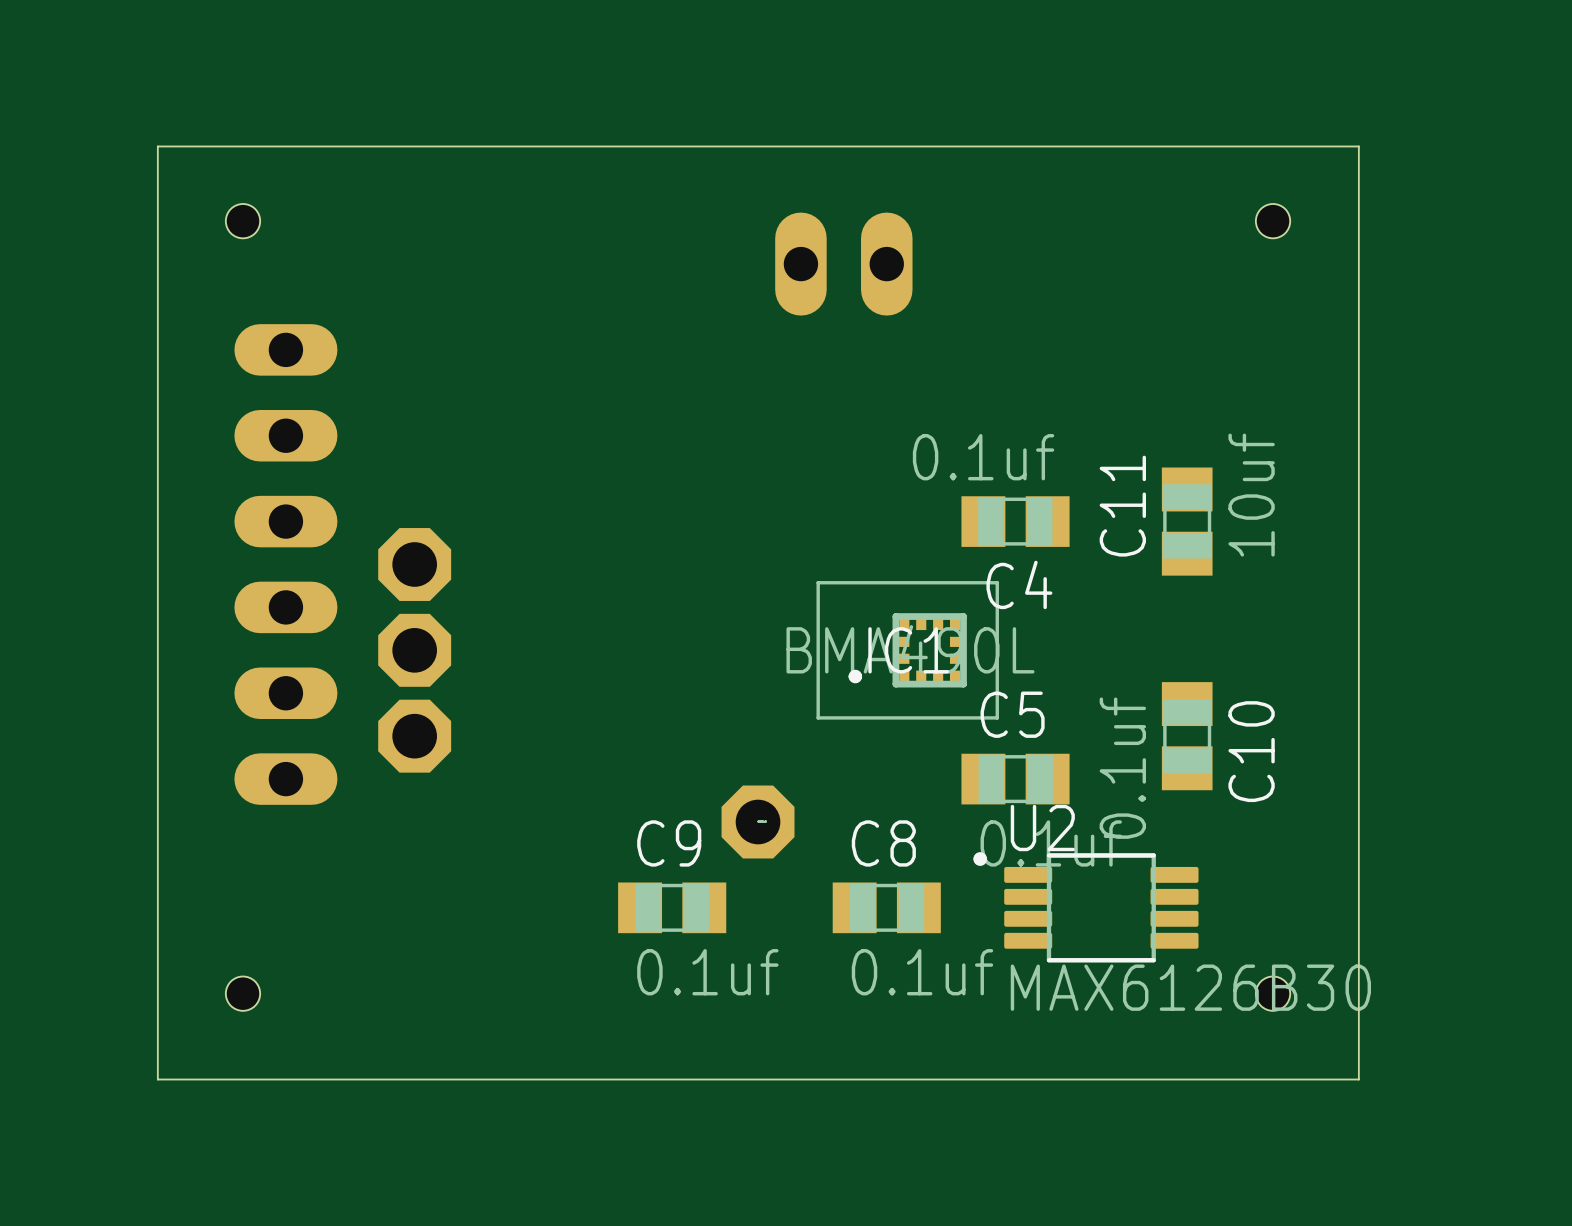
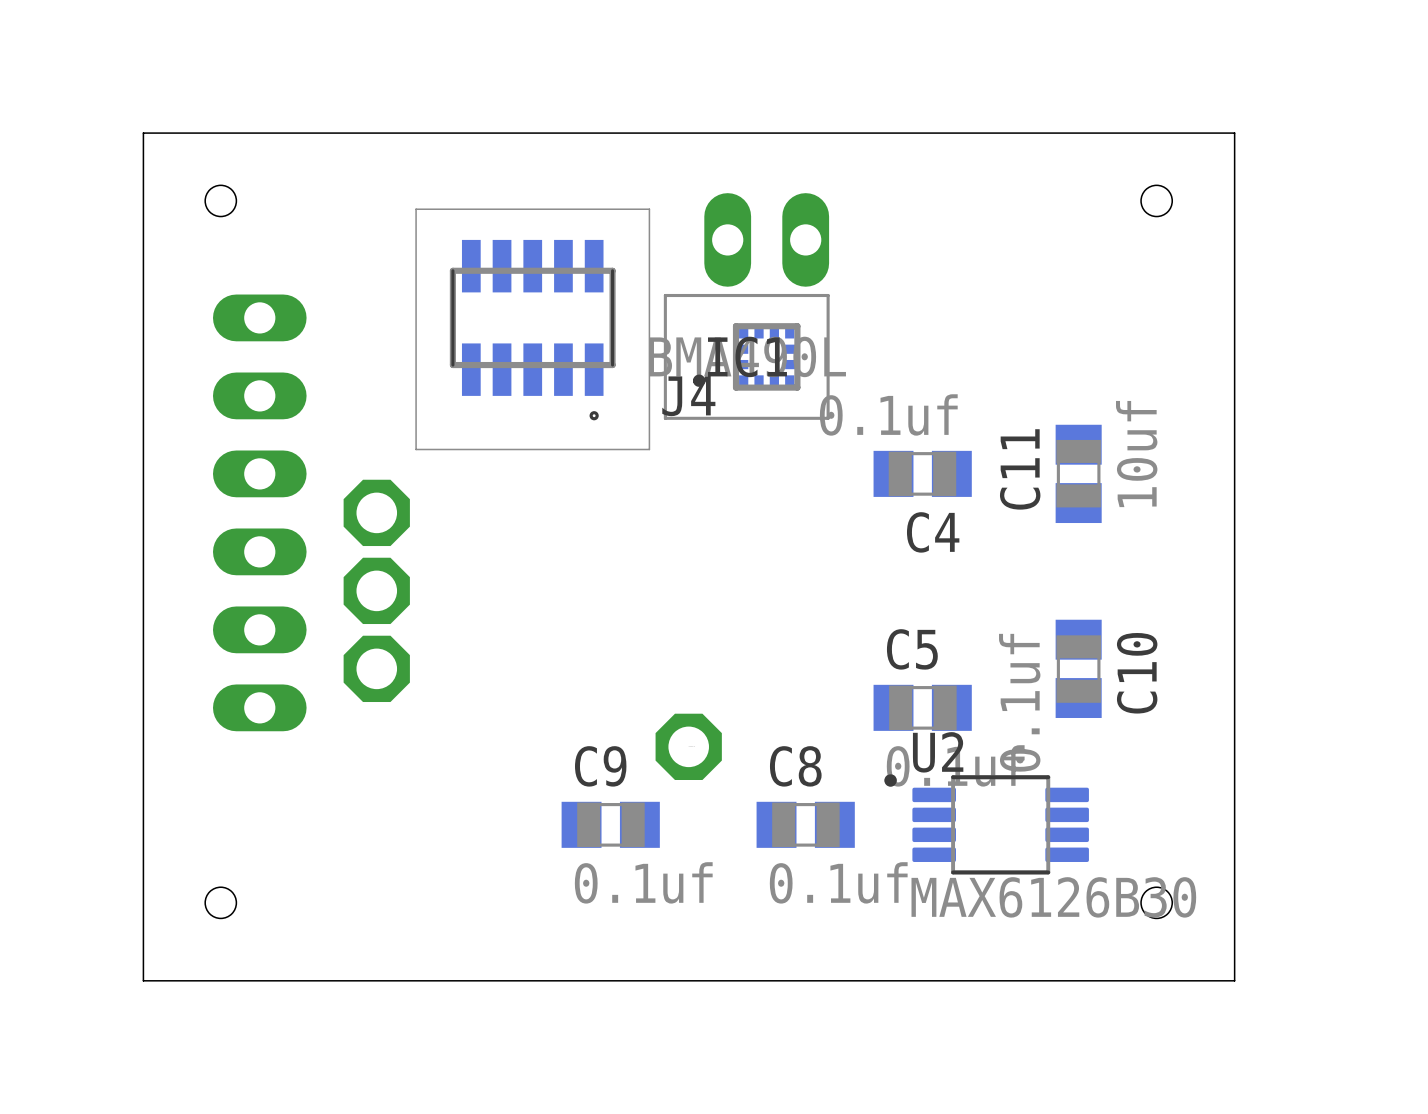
J4: none -> (532, 329)
IC1 position: (907, 650) -> (746, 356)

